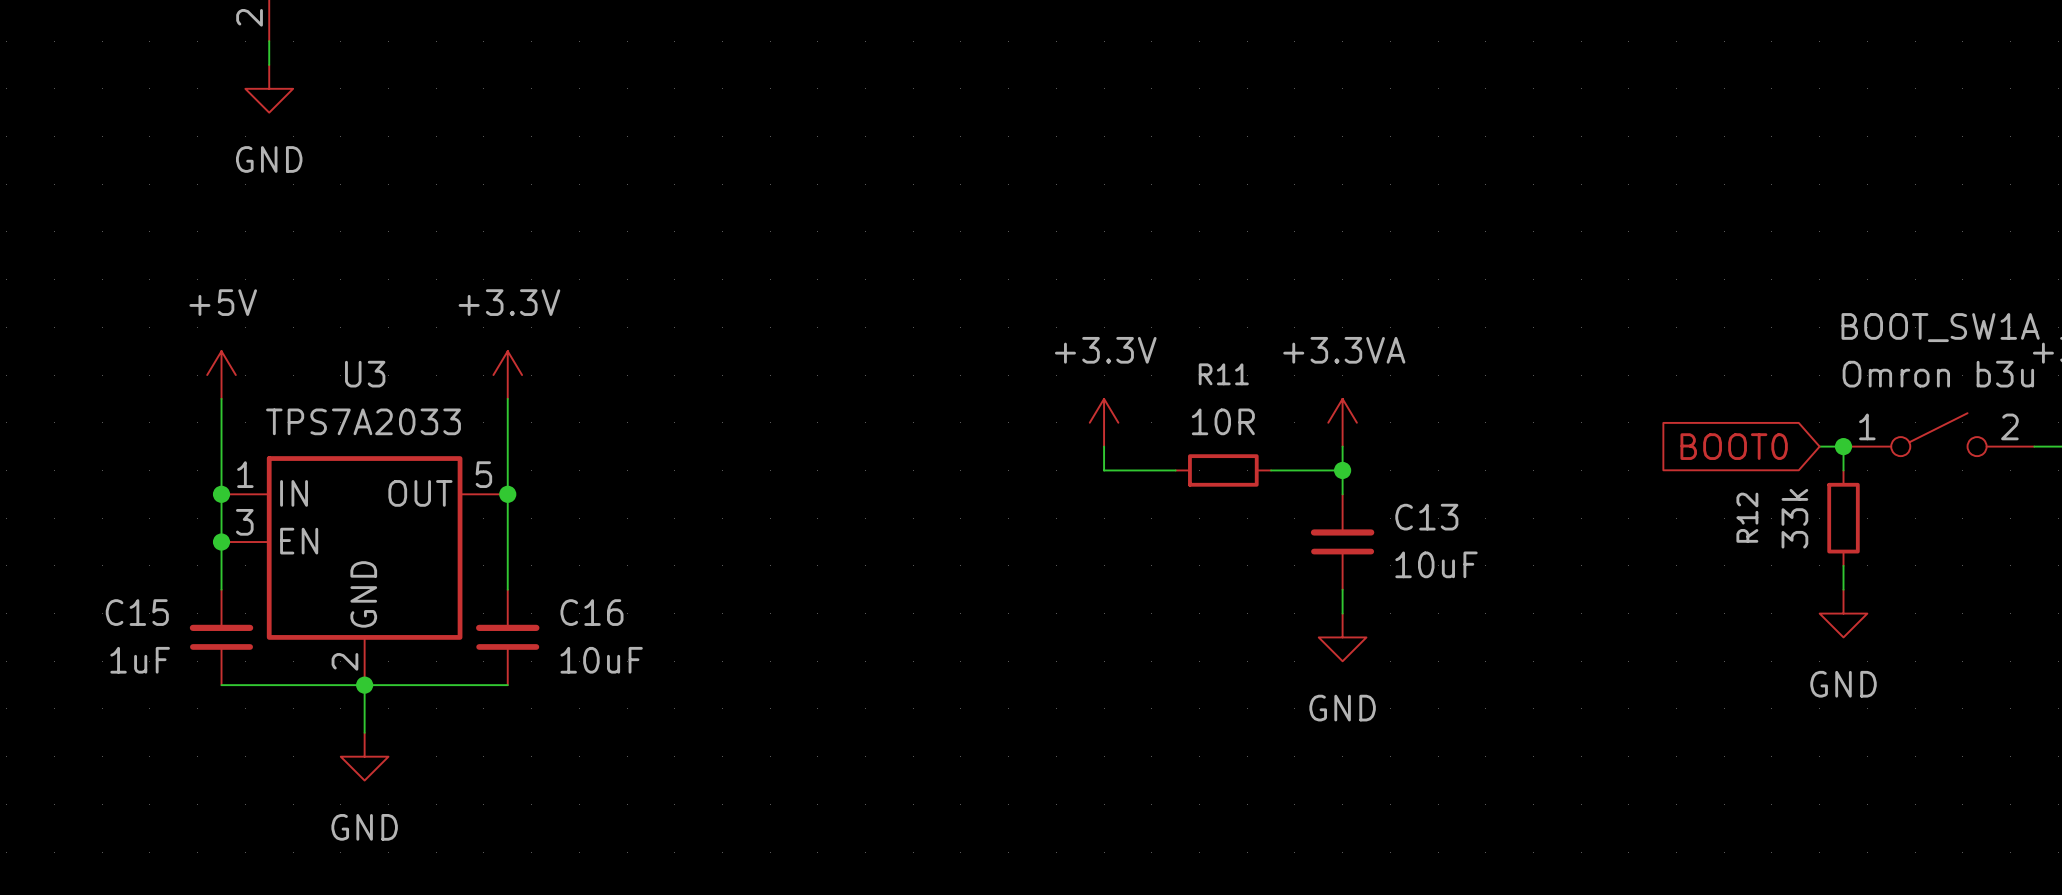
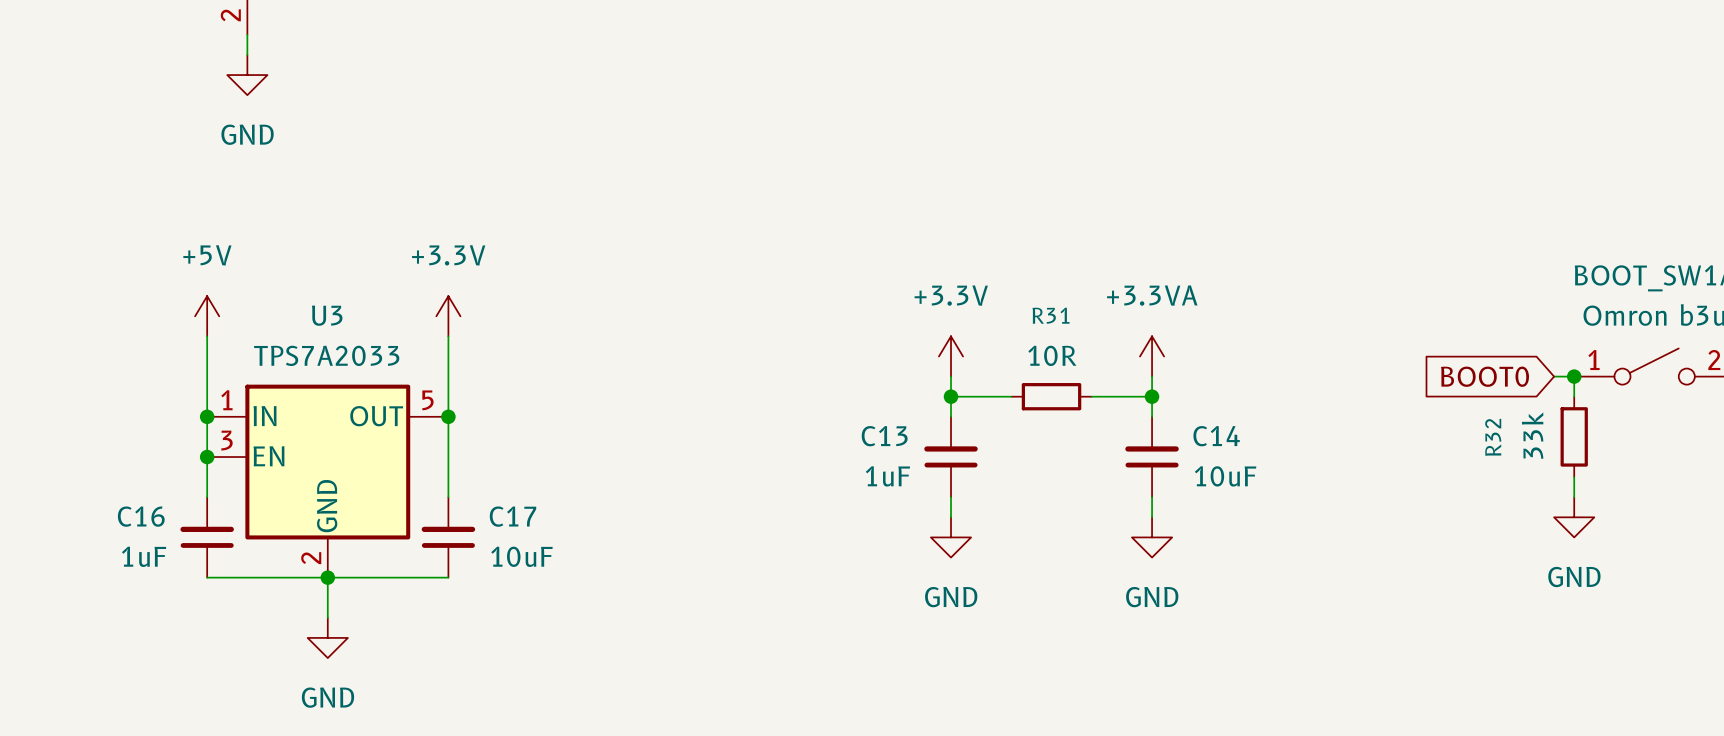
R11 name: R11 (1223, 374) -> R31 (1051, 315)
wire: none -> (951, 396) (951, 416)
junction: none -> (951, 396)
C13 name: C13 (1426, 517) -> C14 (1216, 436)
R12 name: R12 (1747, 517) -> R32 (1493, 437)
C13: none -> 1uF (951, 457)
wire: none -> (951, 497) (951, 517)
C15 name: C15 (137, 612) -> C16 (141, 516)
C16 name: C16 (591, 612) -> C17 (513, 516)
power symbol: none -> GND (951, 537)

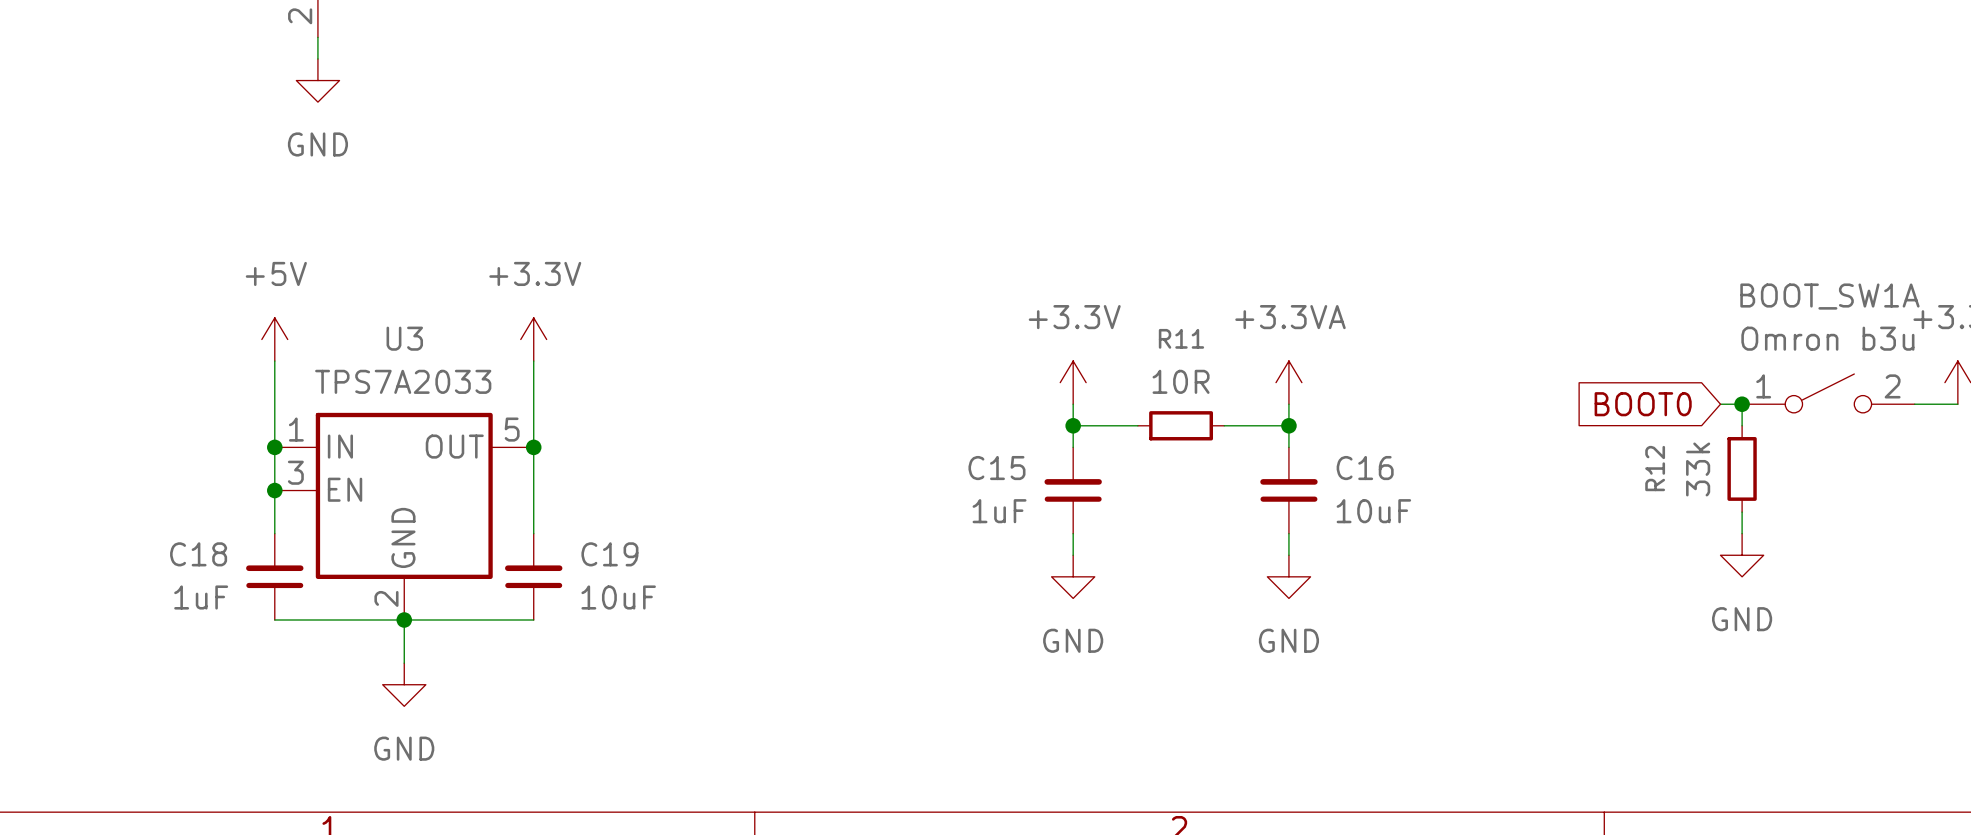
R31 name: R31 (1051, 315) -> R11 (1181, 338)
C13 name: C13 (884, 436) -> C15 (996, 468)
C14 name: C14 (1216, 436) -> C16 (1365, 468)
R32 name: R32 (1493, 437) -> R12 (1655, 468)
C16 name: C16 (141, 516) -> C18 (198, 554)
C17 name: C17 (513, 516) -> C19 (609, 554)

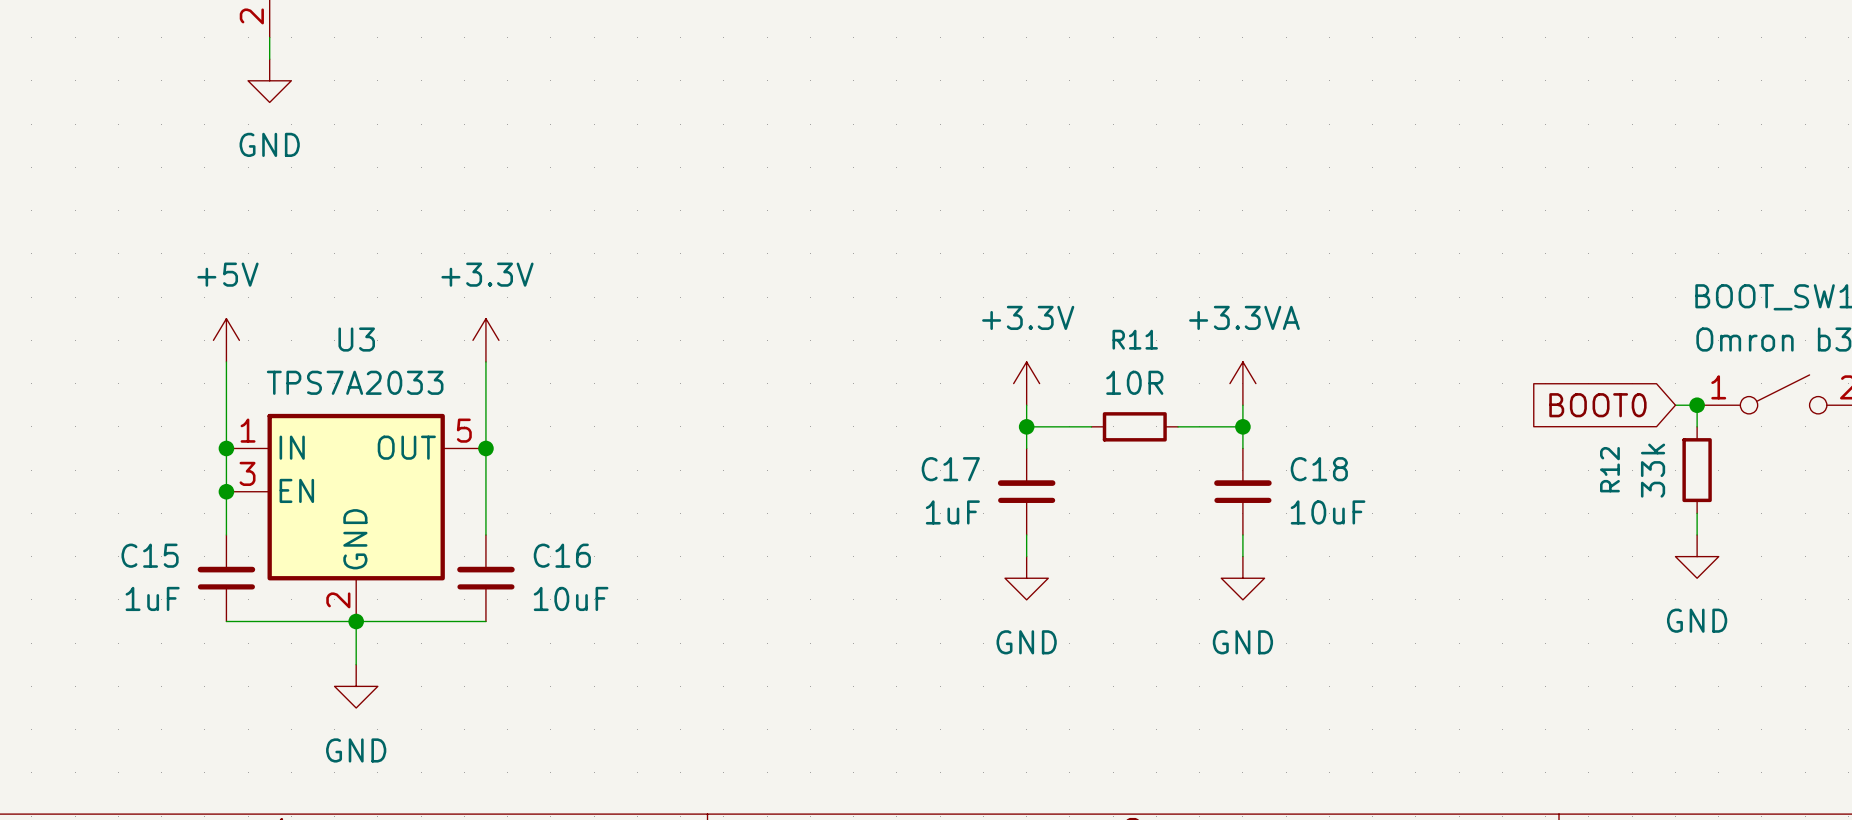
C15 name: C15 (996, 468) -> C17 (950, 469)
C16 name: C16 (1365, 468) -> C18 (1319, 469)
C18 name: C18 (198, 554) -> C15 (150, 555)
C19 name: C19 (609, 554) -> C16 (562, 555)

